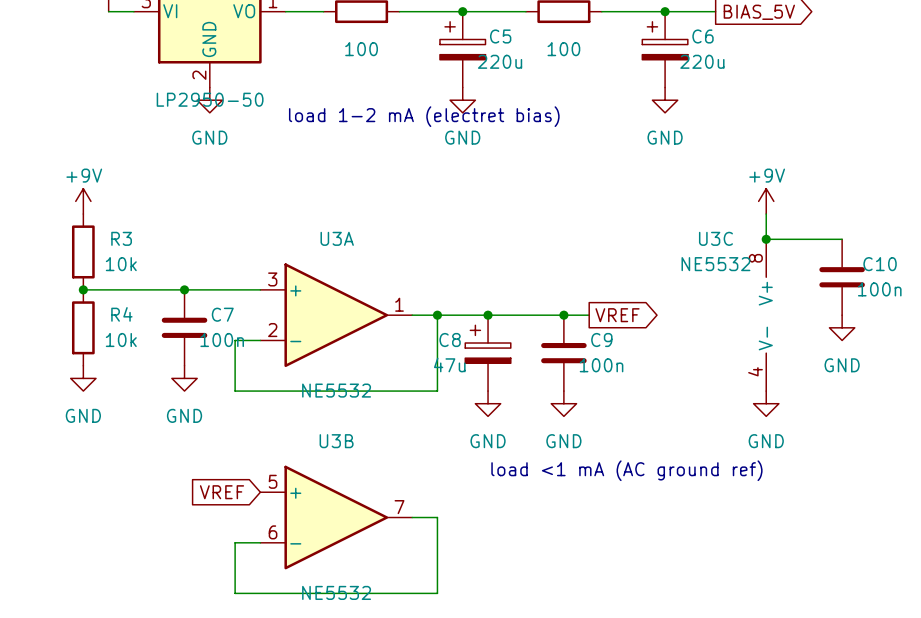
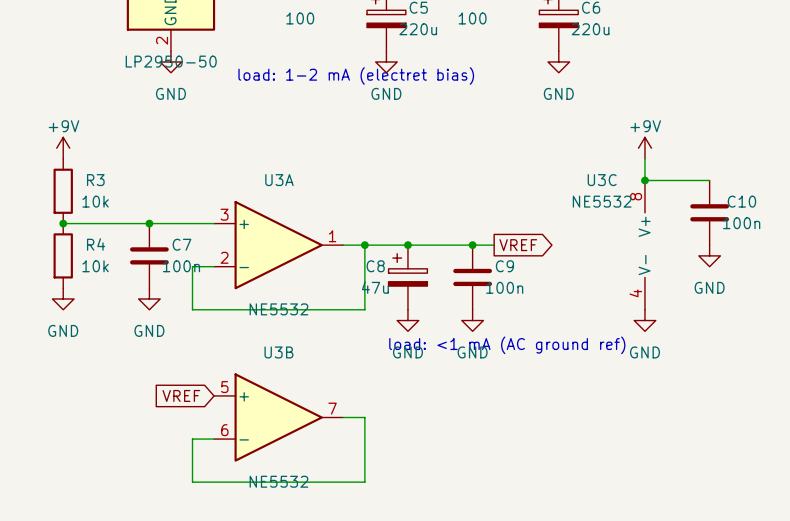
text: load 1-2 mA (electret bias) (424, 116) -> load: 1-2 mA (electret bias) (356, 75)
text: none -> load: <1 mA (AC ground ref) (507, 345)
text: load <1 mA (AC ground ref) (626, 470) -> none

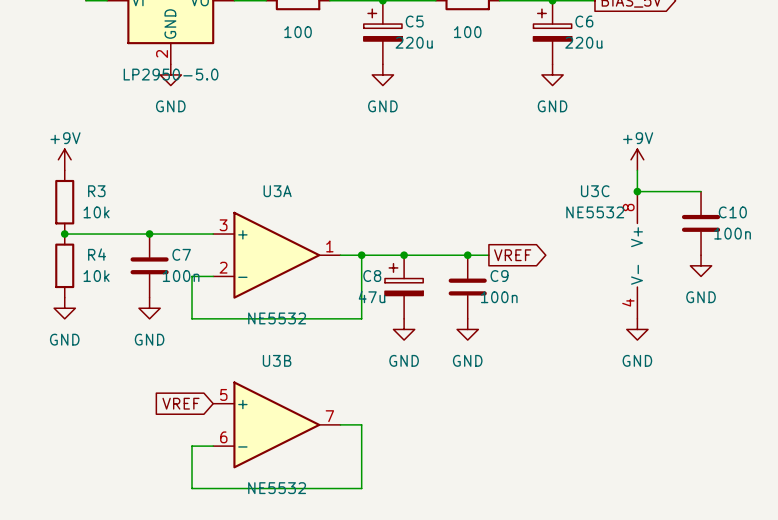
part value: LP2950-50 (171, 61) -> LP2950-5.0 (171, 74)
text: load: 1-2 mA (electret bias) (356, 75) -> none
text: load: <1 mA (AC ground ref) (507, 345) -> none

